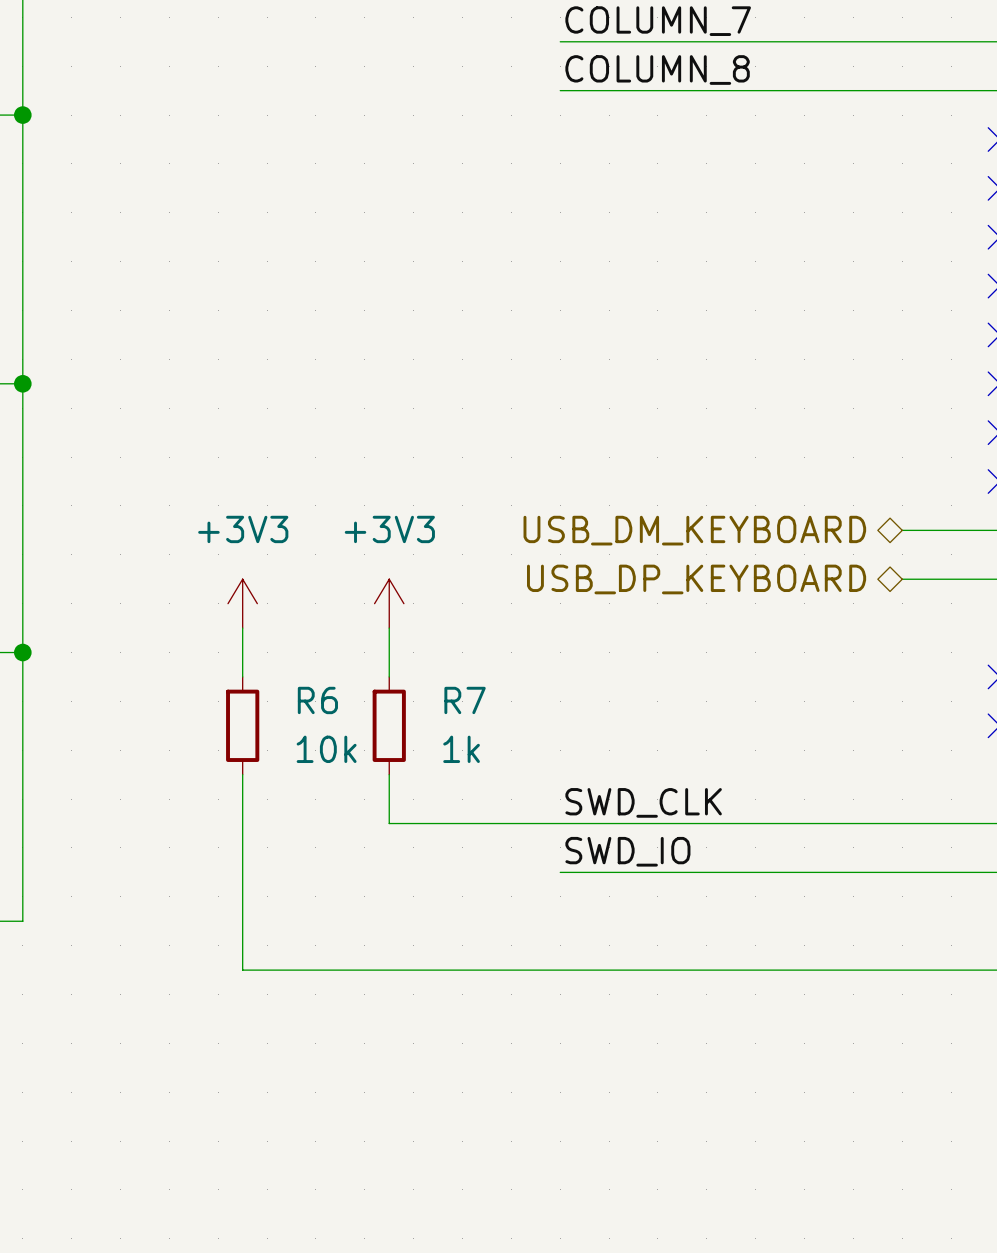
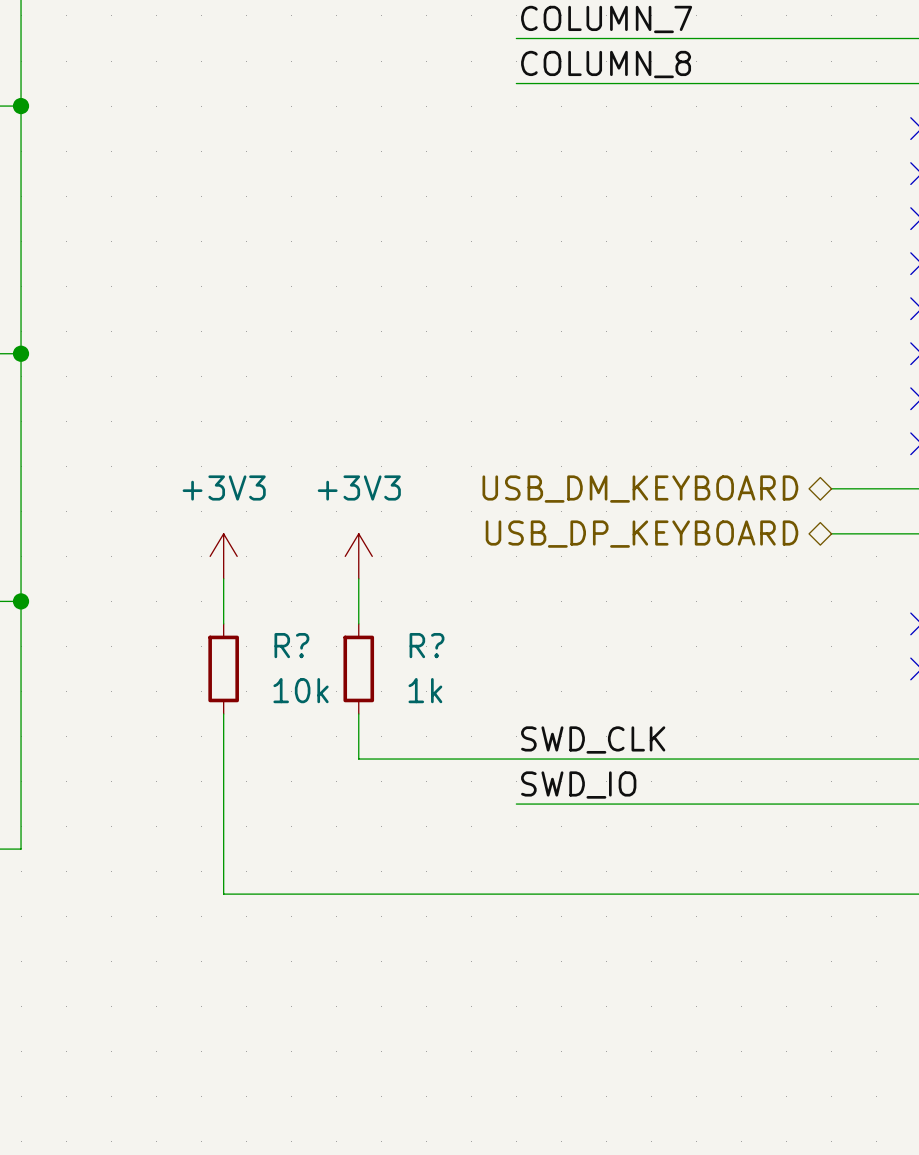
R6 name: R6 (317, 700) -> R? (291, 645)
R7 name: R7 (465, 700) -> R? (427, 645)

